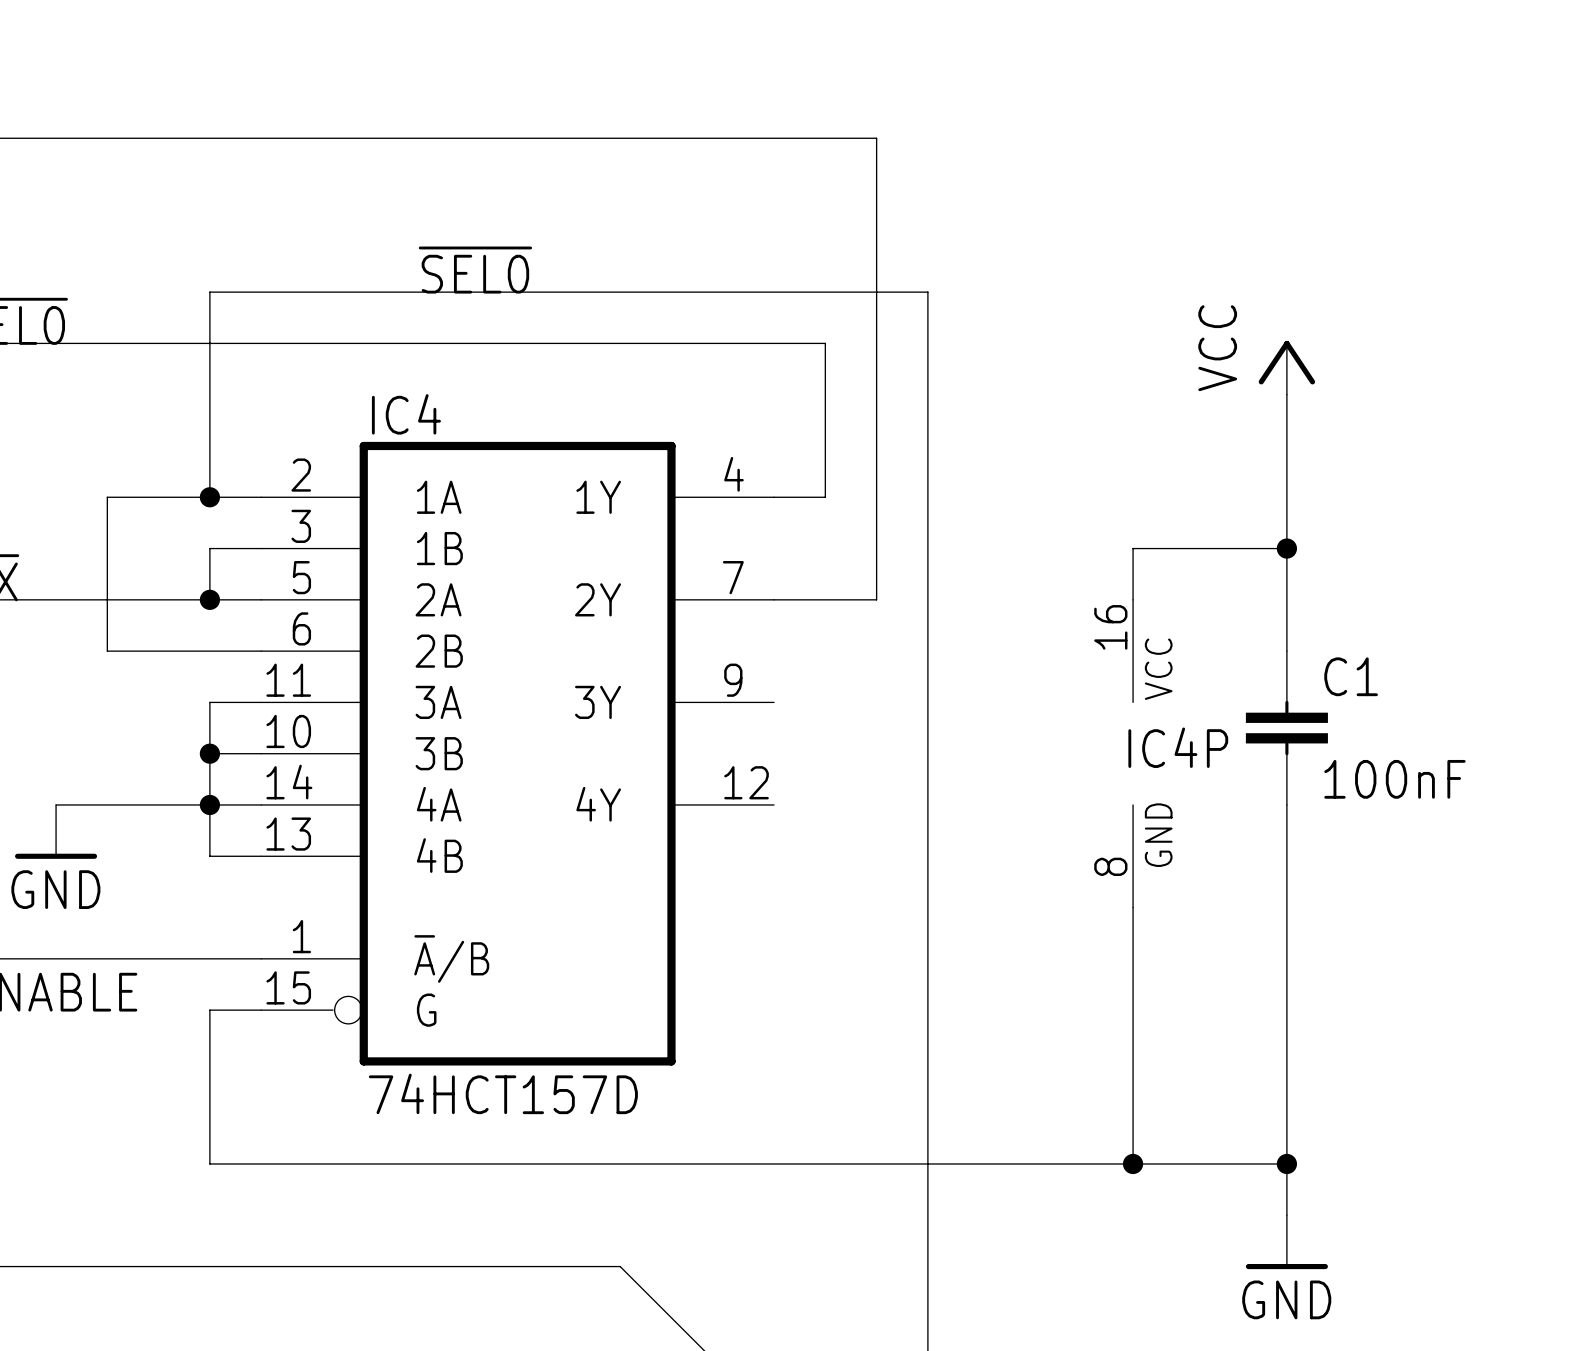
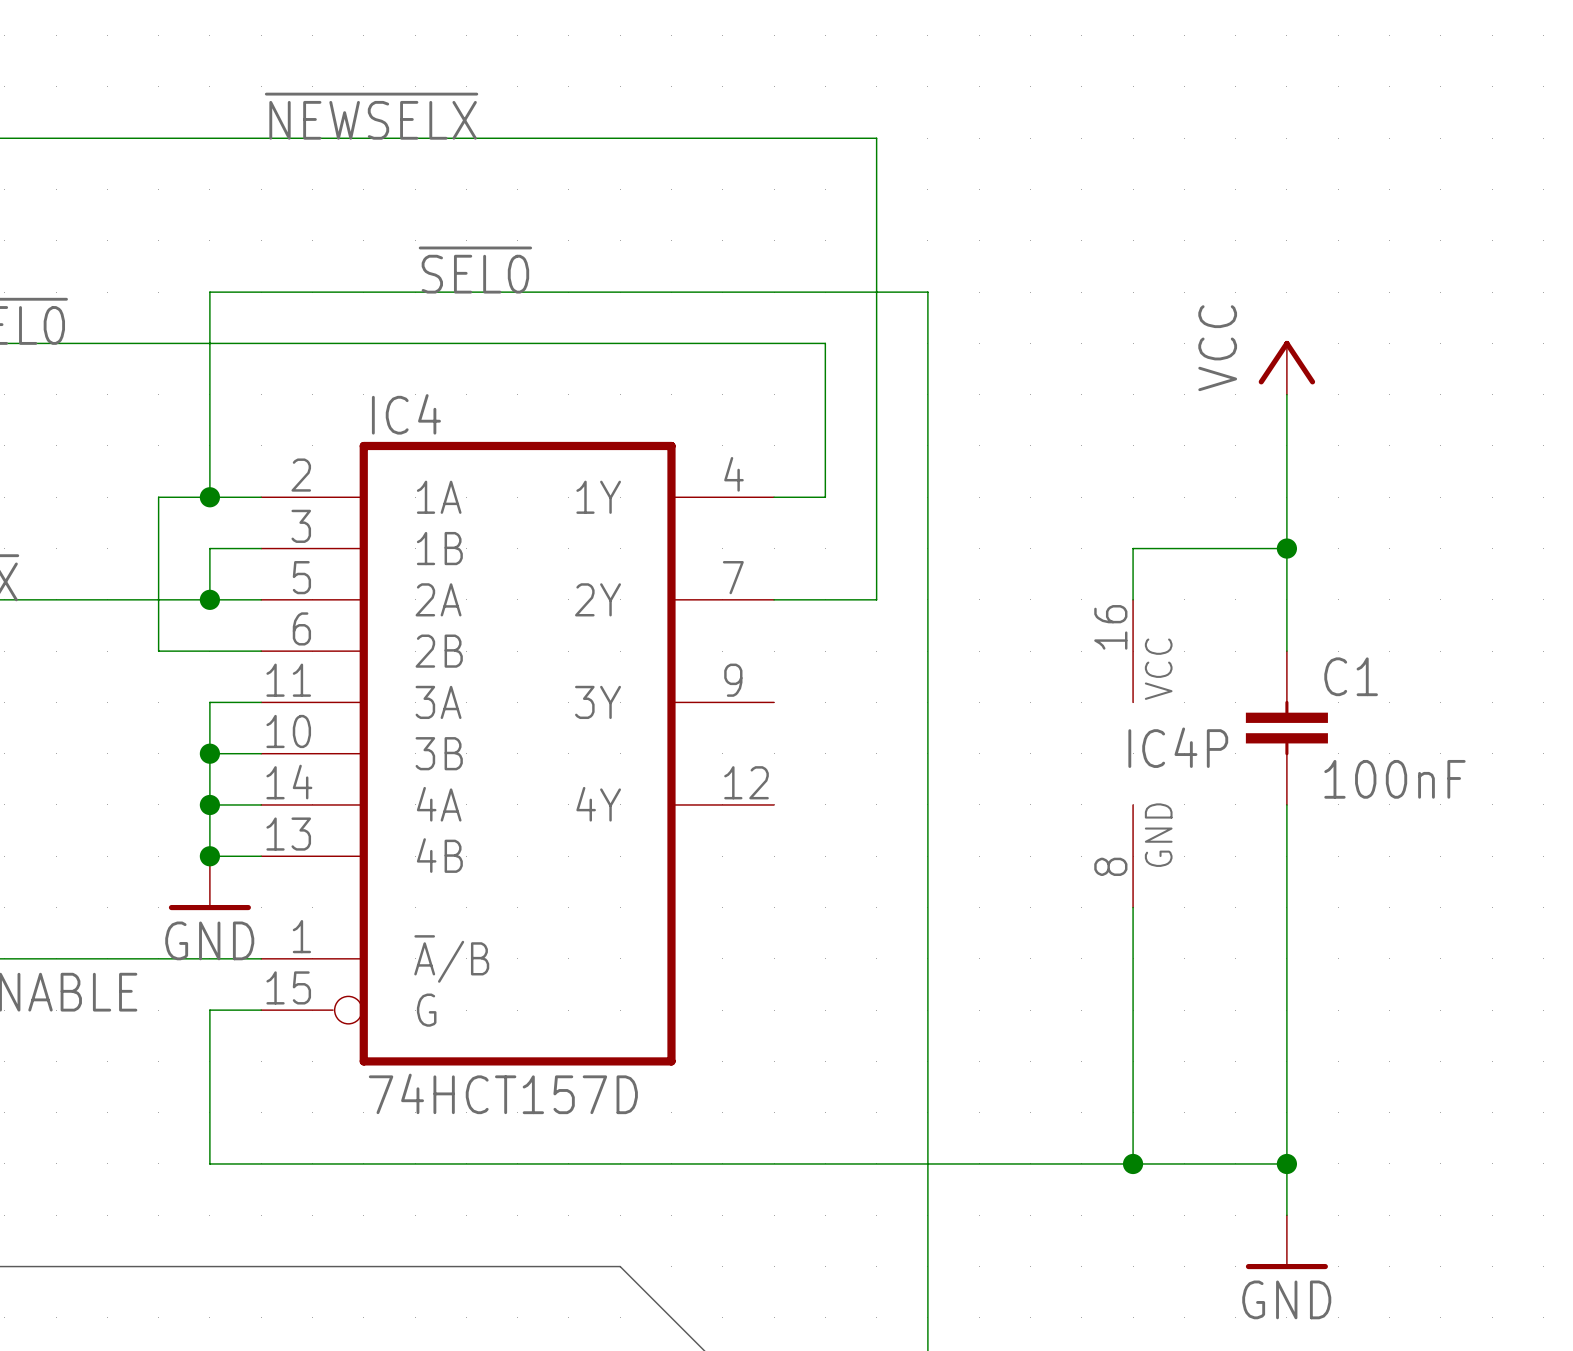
label: none -> ~{NEWSELX} (371, 116)
wire: (158, 497) (107, 497) (107, 651) (158, 651) -> (158, 497) (158, 651)
wire: (56, 804) (209, 804) -> none
power symbol position: GND (56, 831) -> GND (209, 883)
junction: none -> (209, 856)

